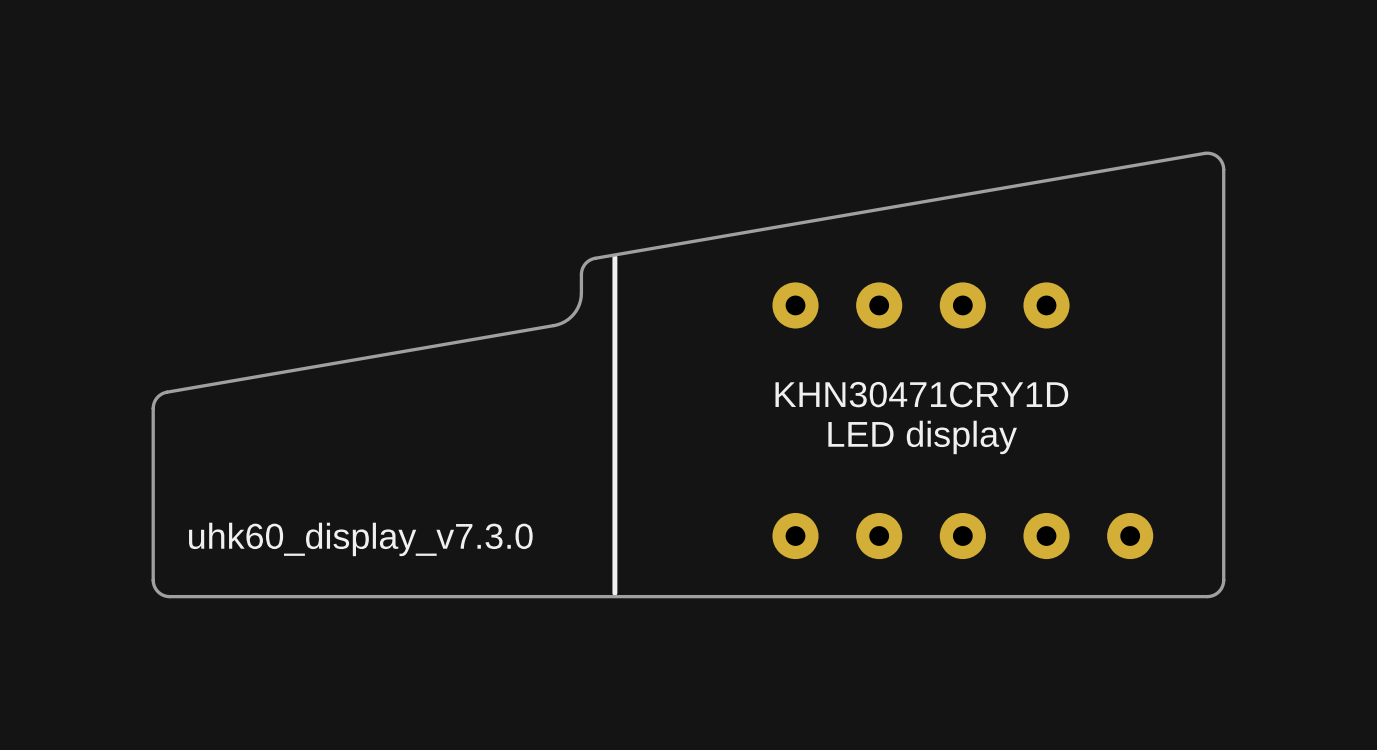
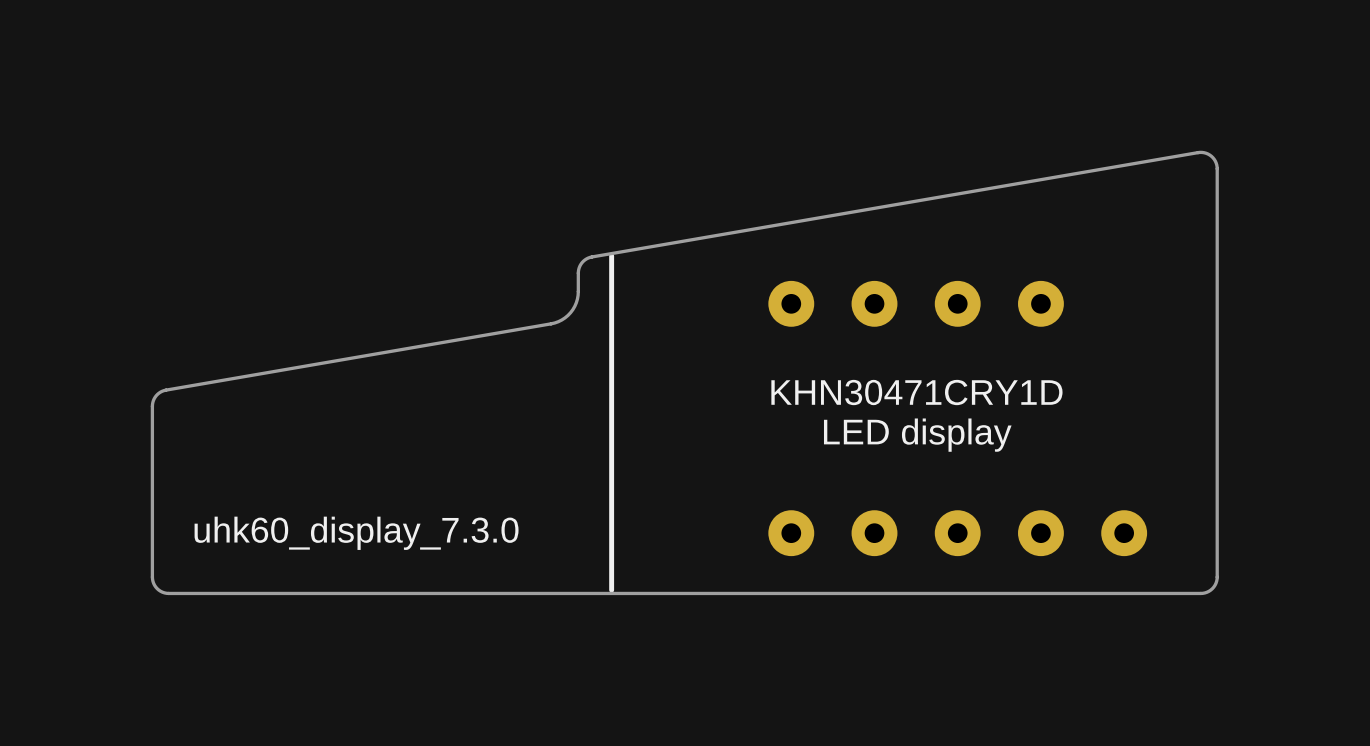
text: uhk60_display_v7.3.0 (360, 539) -> uhk60_display_7.3.0 (356, 533)

